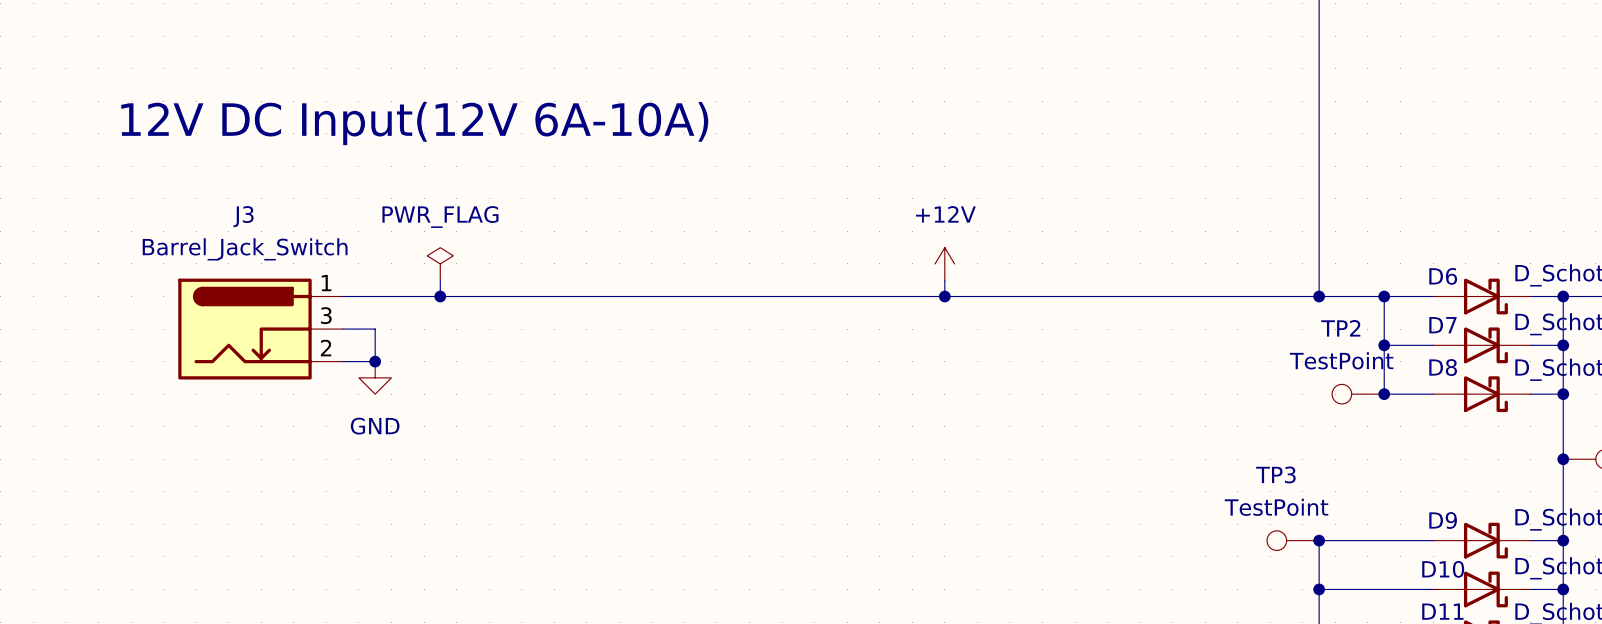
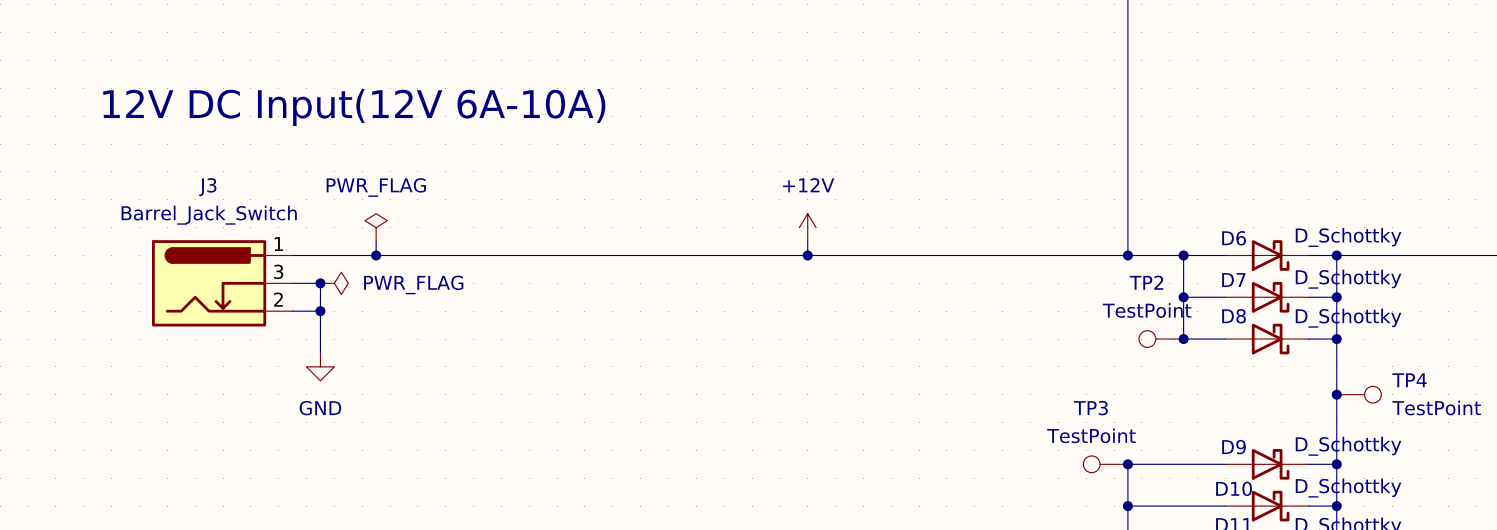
junction: none -> (320, 283)
power symbol: none -> PWR_FLAG (334, 283)
wire: none -> (320, 311) (320, 352)
power symbol position: GND (375, 377) -> GND (320, 366)

